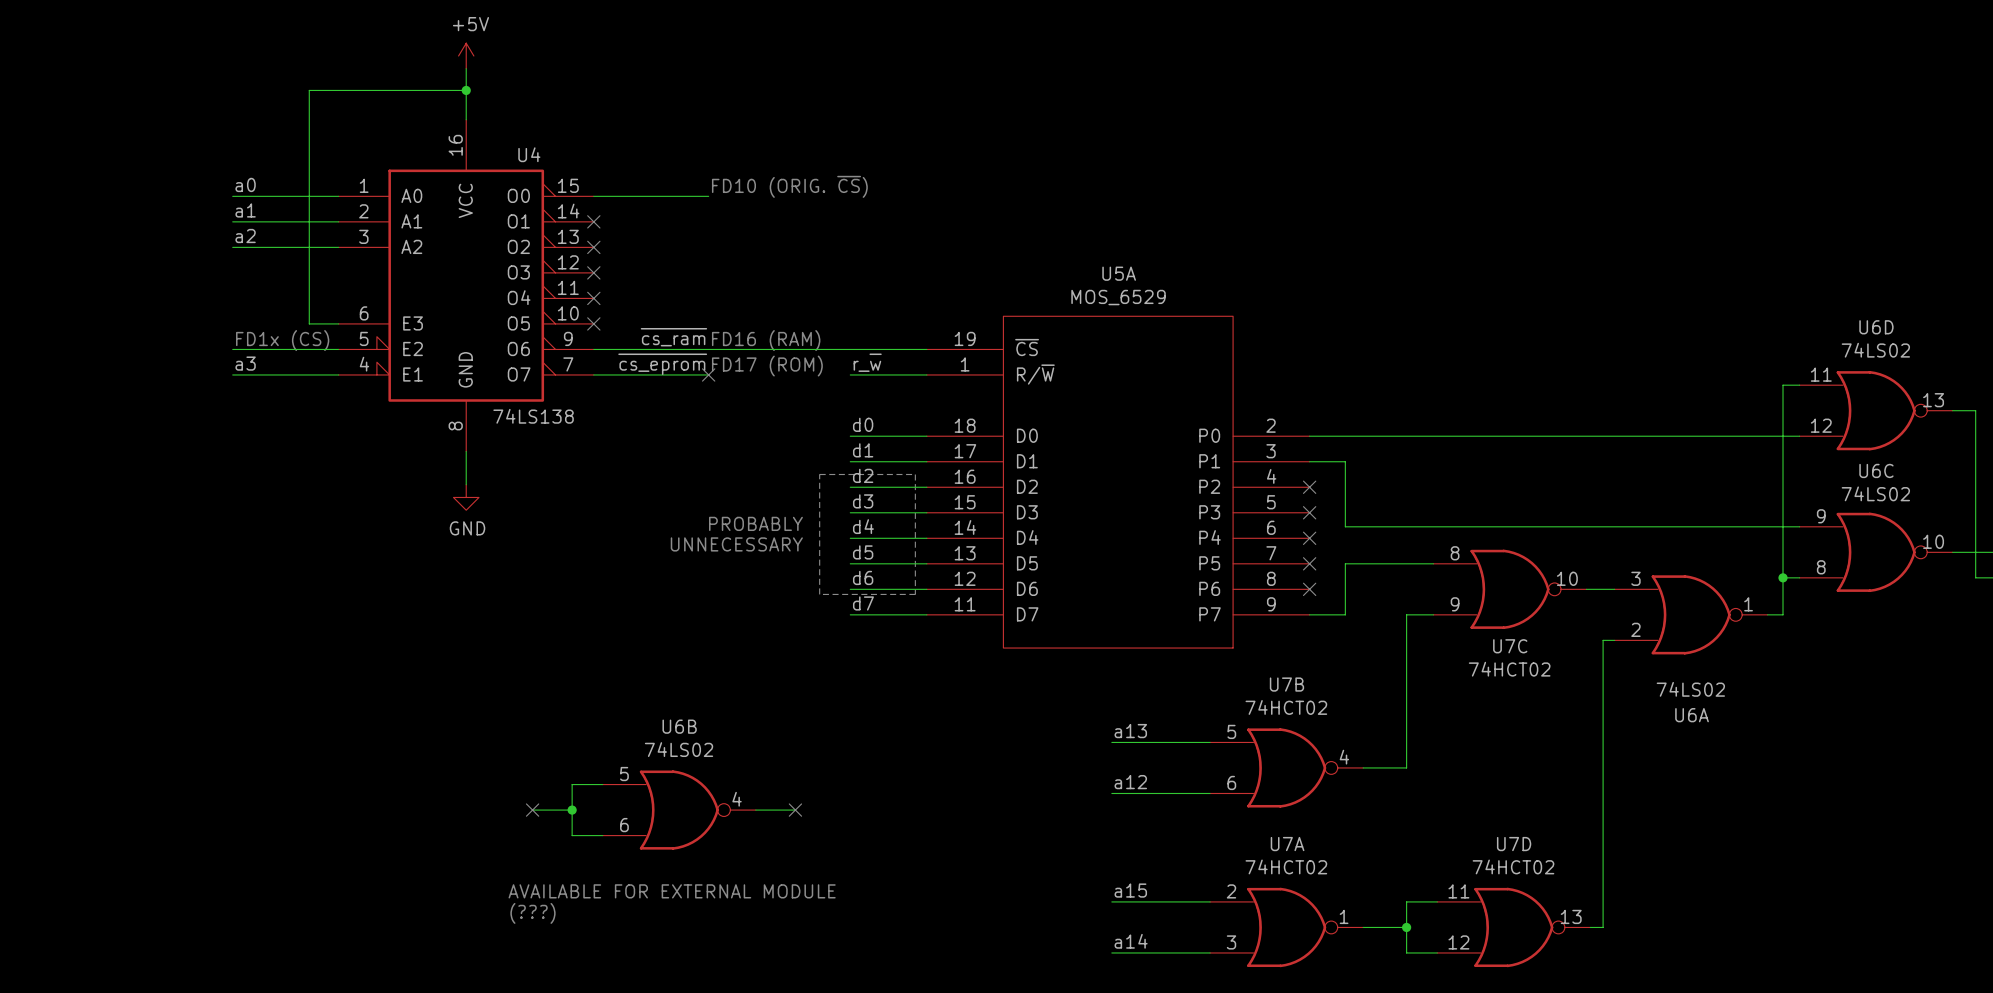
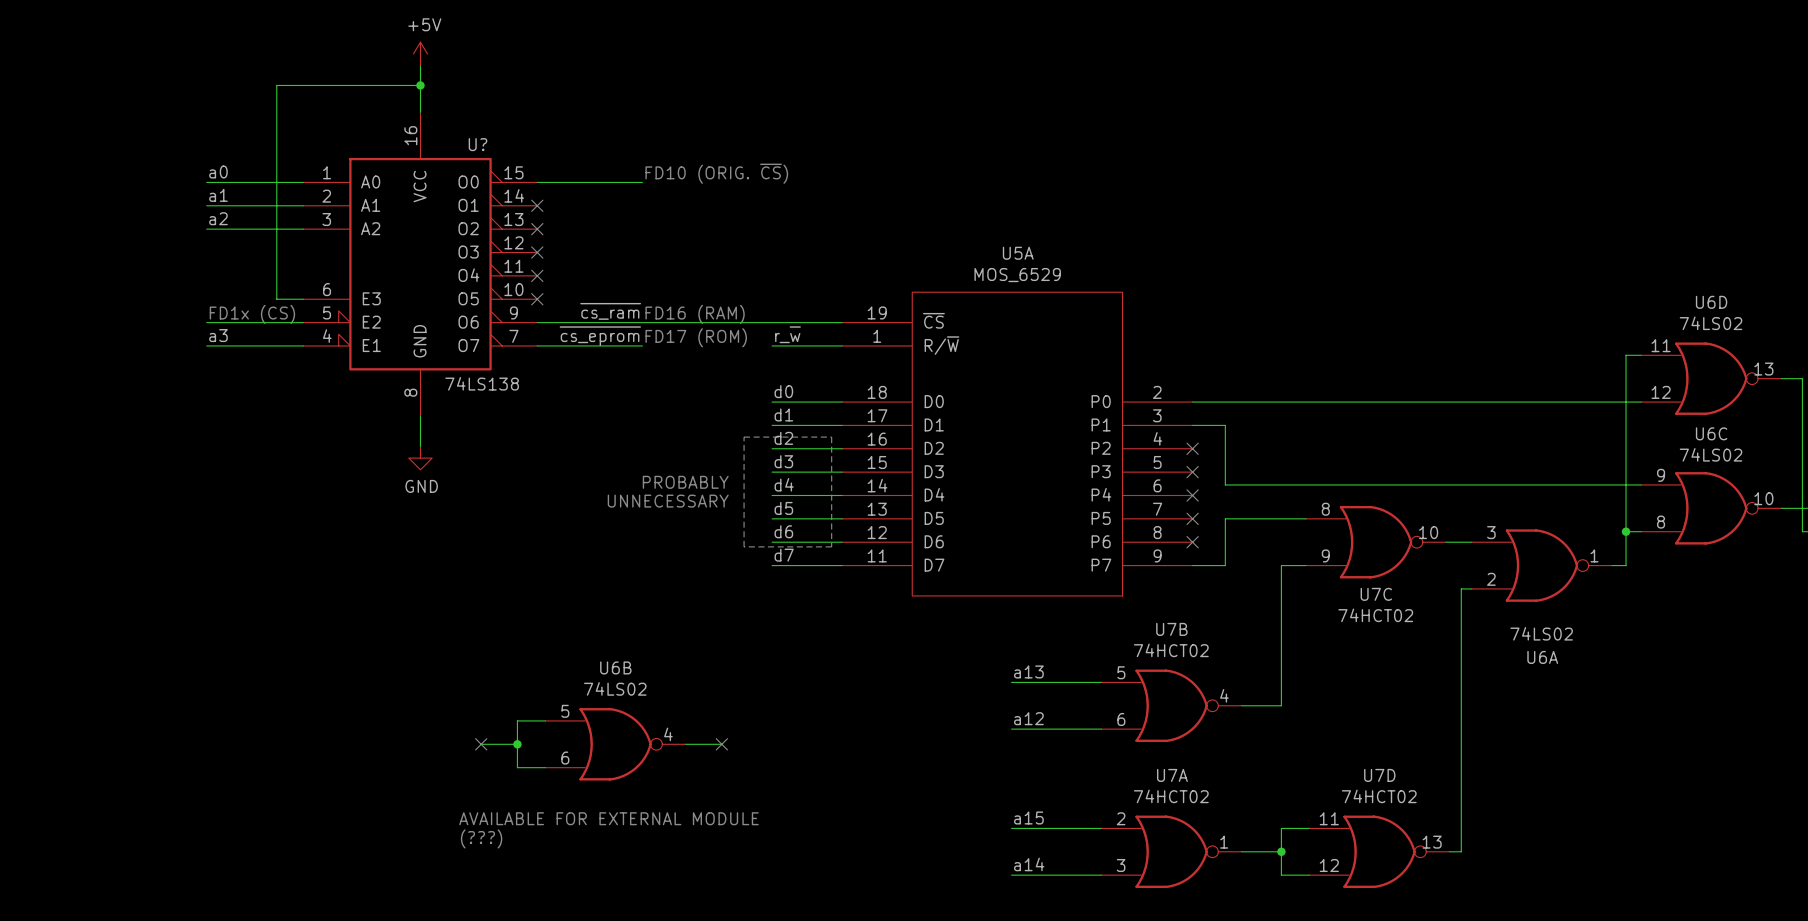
U4 name: U4 (529, 154) -> U? (477, 144)
no-connect mark: (708, 374) -> none

